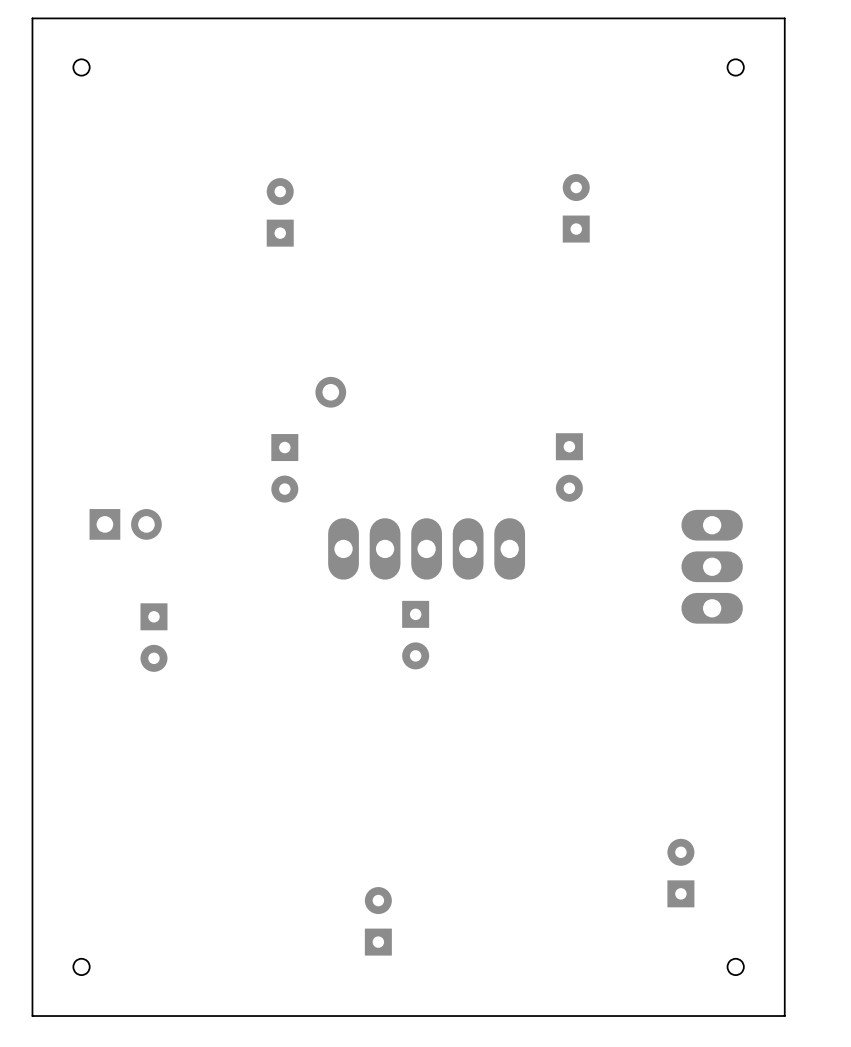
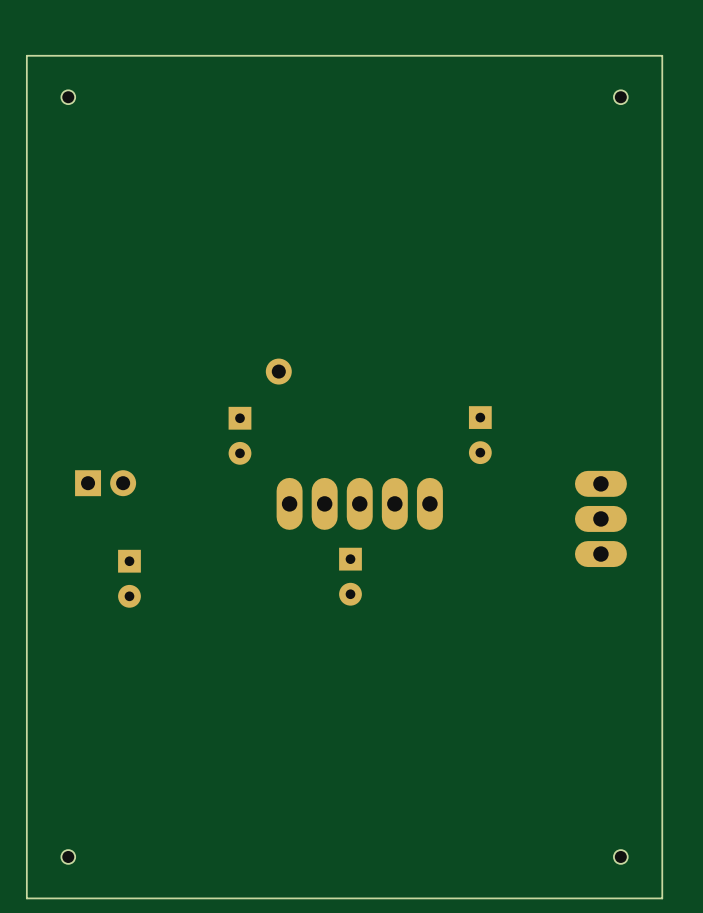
part: (576, 208) -> none
part: (280, 212) -> none
part: (680, 873) -> none
part: (378, 921) -> none

